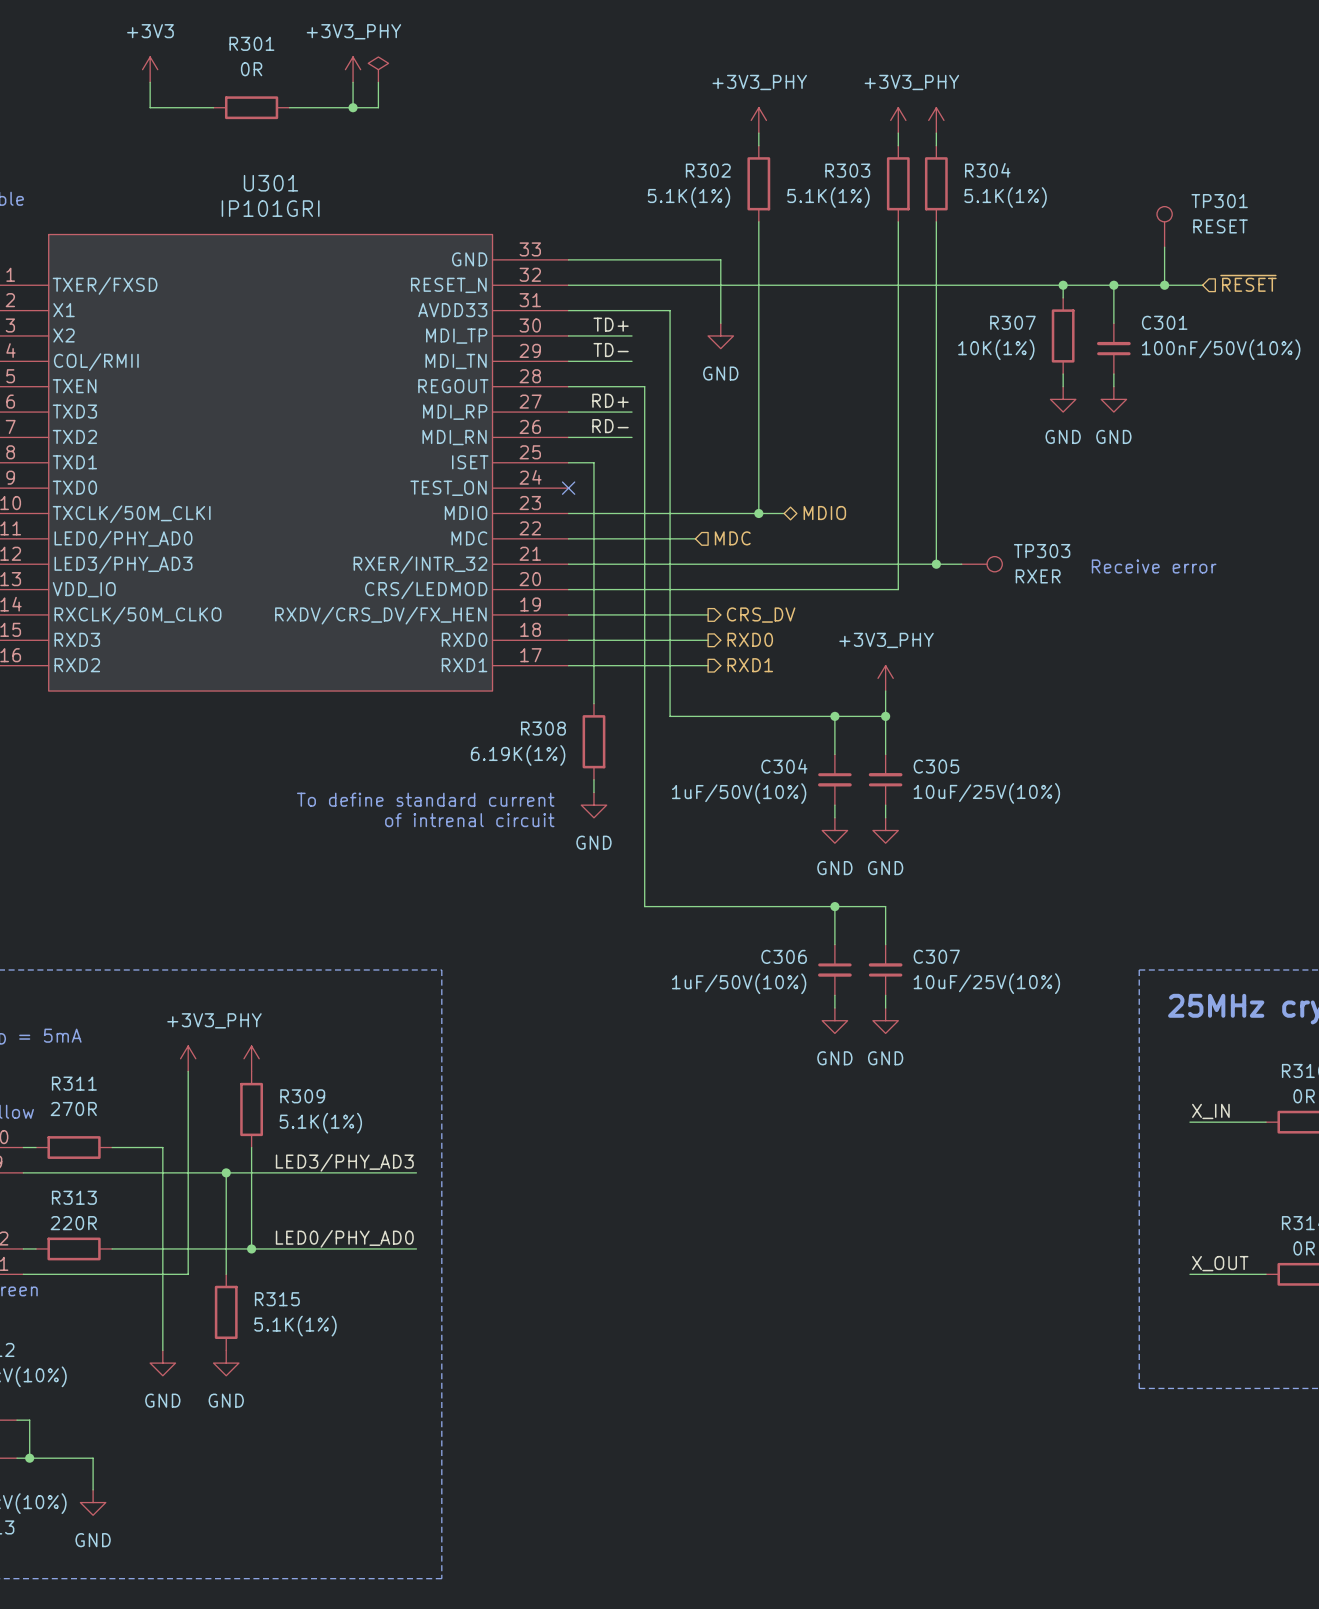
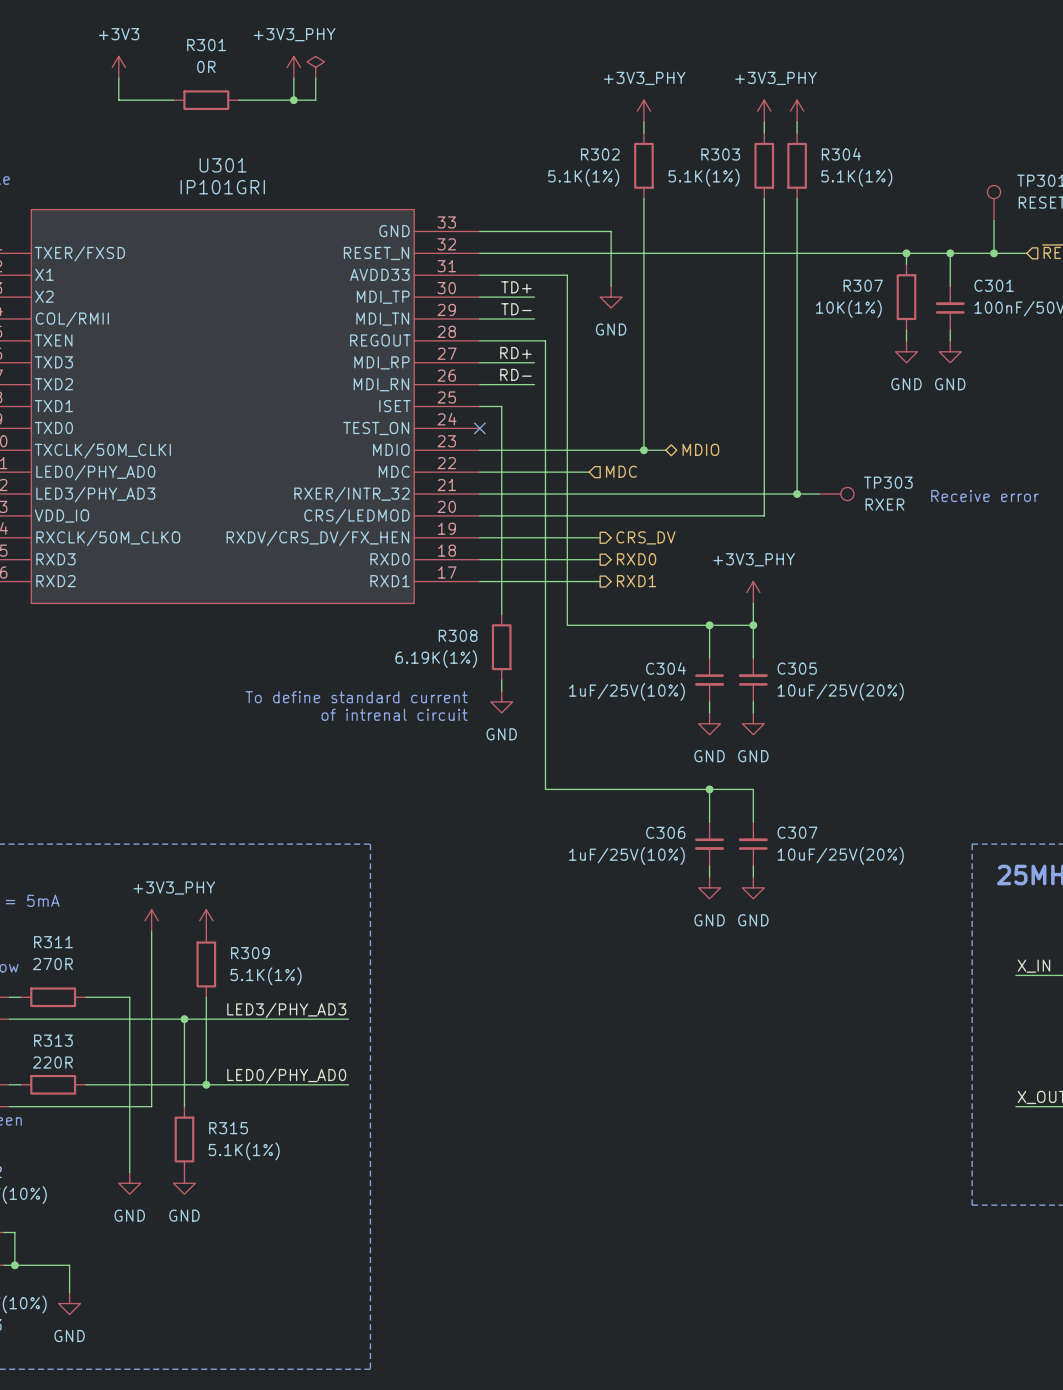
C304 value: 1uF/50V(10%) (739, 793) -> 1uF/25V(10%) (626, 691)
C305 value: 10uF/25V(10%) (986, 793) -> 10uF/25V(20%) (840, 691)
C306 value: 1uF/50V(10%) (739, 983) -> 1uF/25V(10%) (626, 856)
C307 value: 10uF/25V(10%) (986, 983) -> 10uF/25V(20%) (840, 855)

